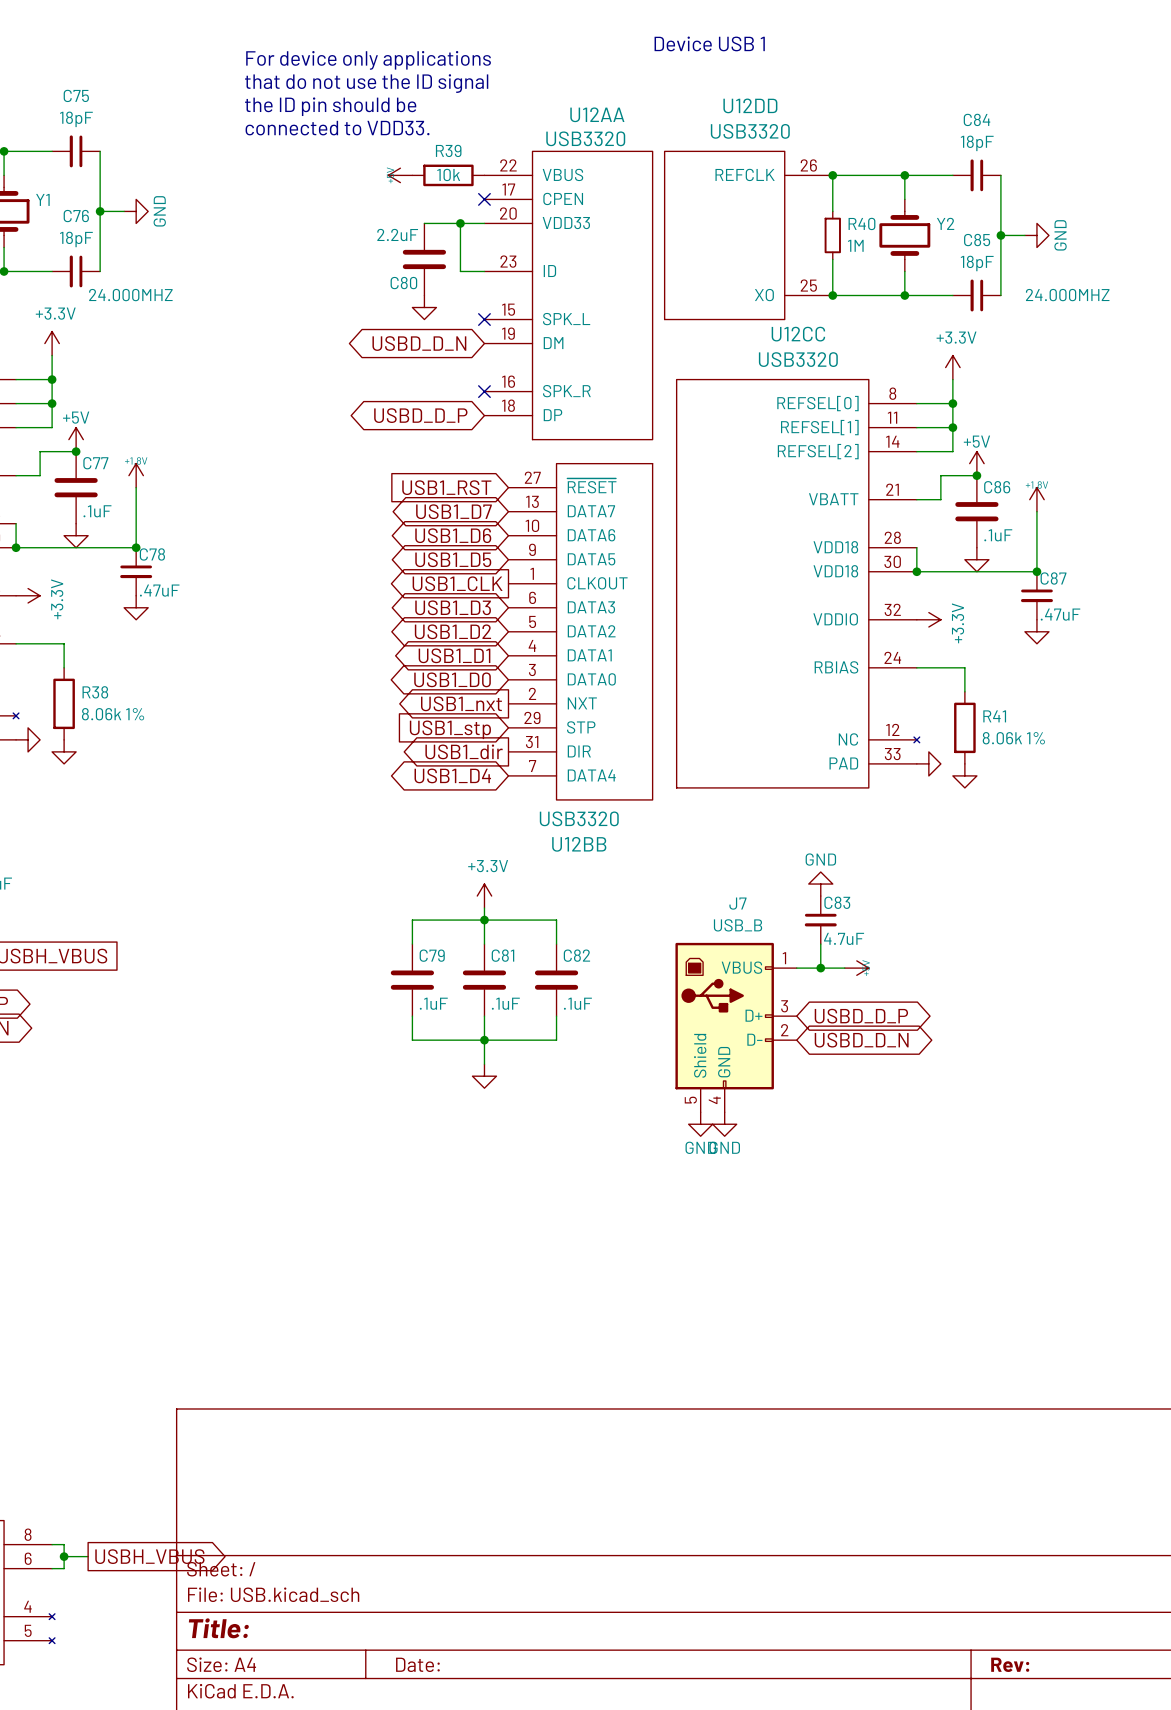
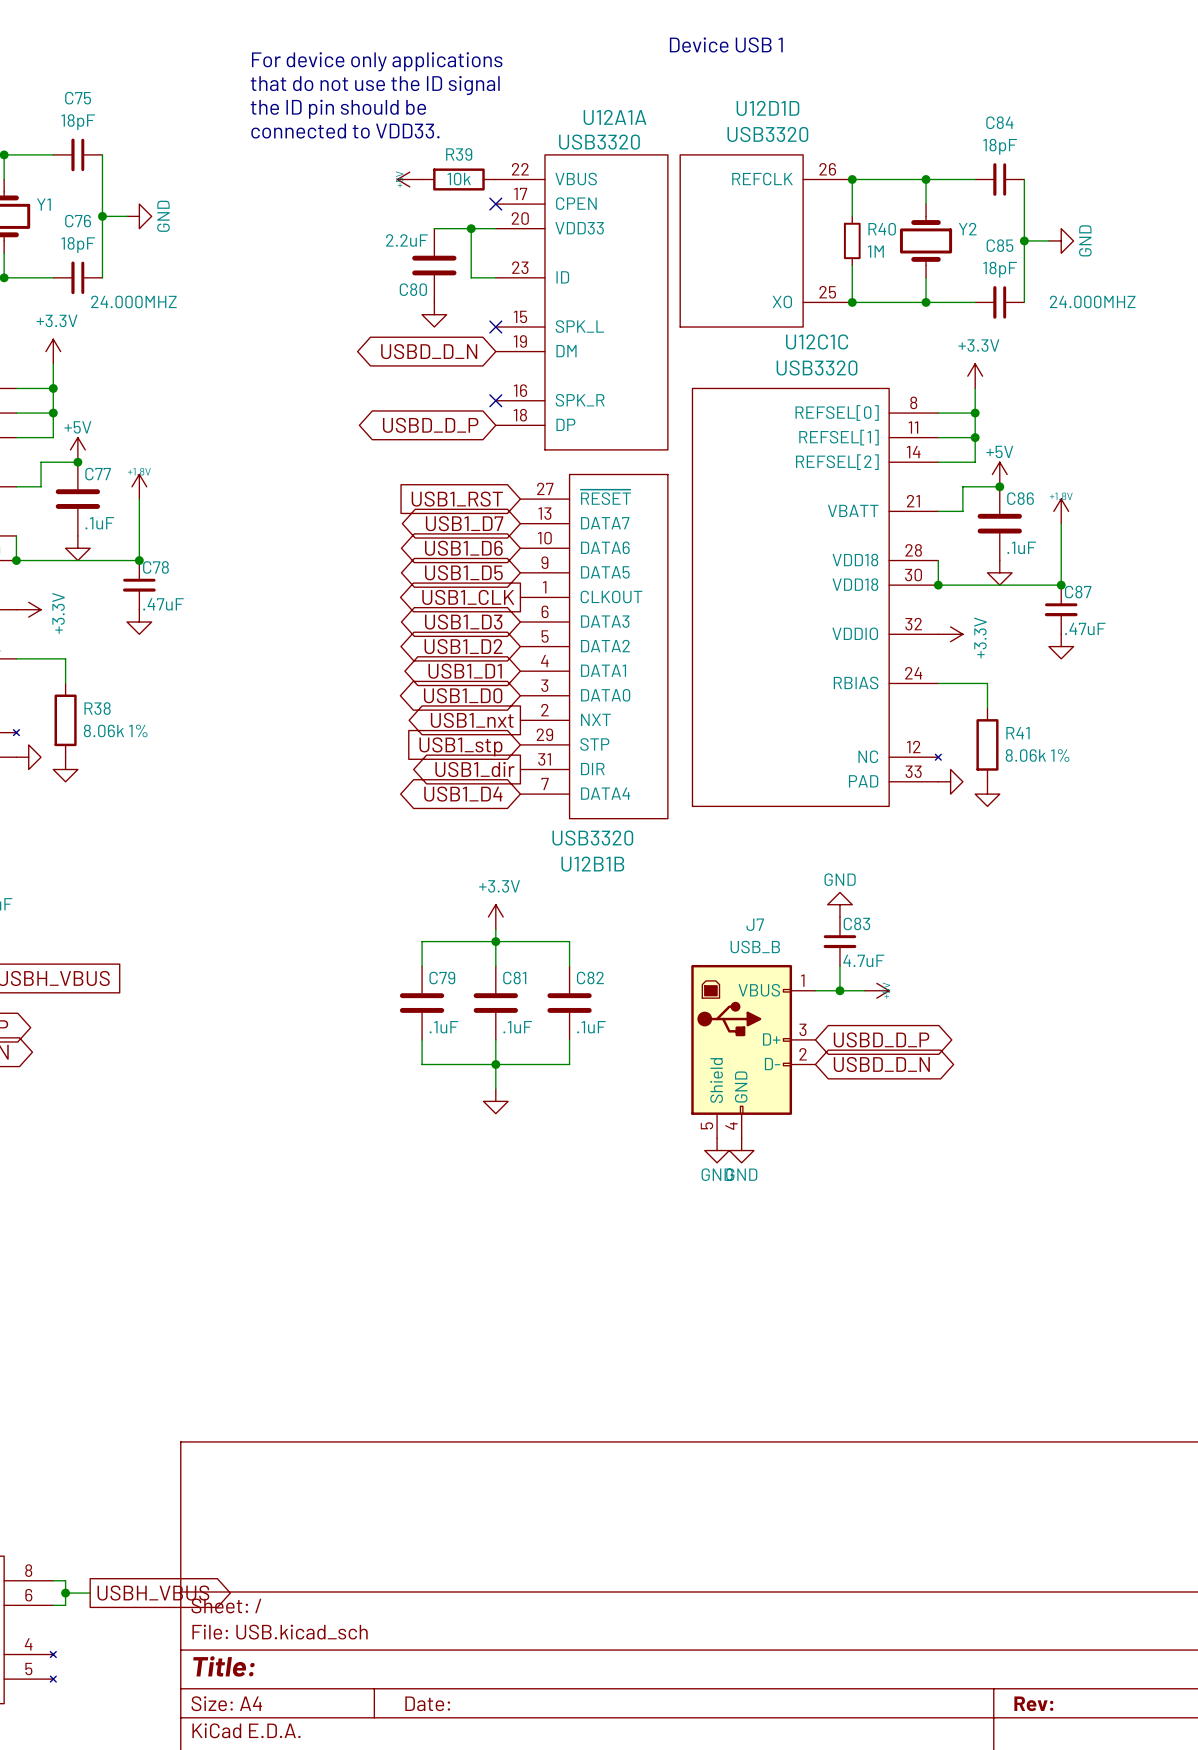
U12DD name: U12DD (750, 105) -> U12D1D (767, 108)
U12AA name: U12AA (597, 114) -> U12A1A (615, 117)
U12CC name: U12CC (798, 334) -> U12C1C (817, 341)
U12BB name: U12BB (579, 844) -> U12B1B (592, 864)

